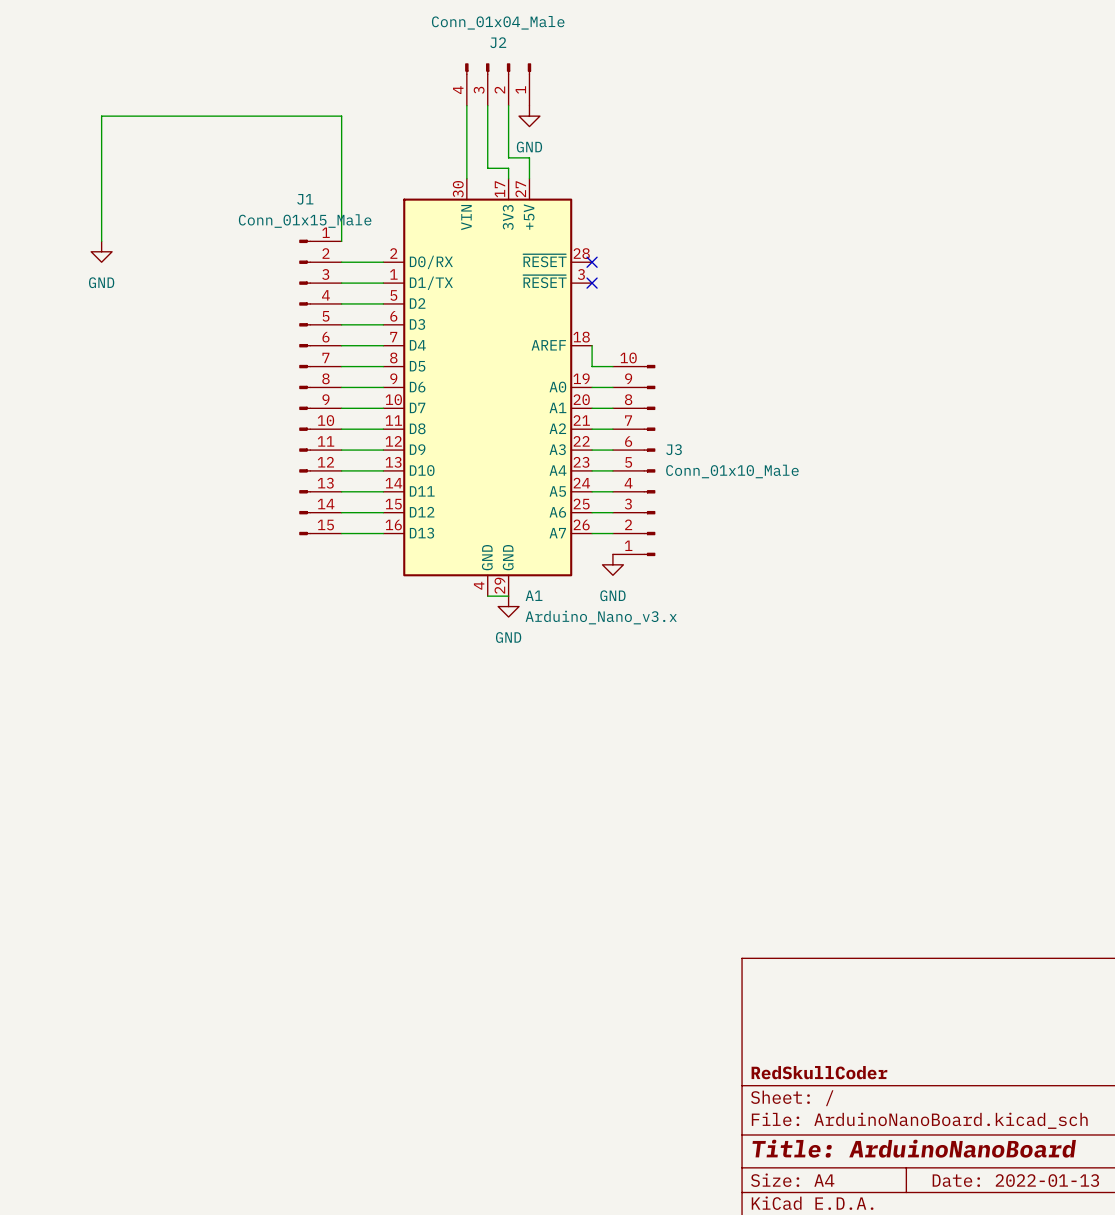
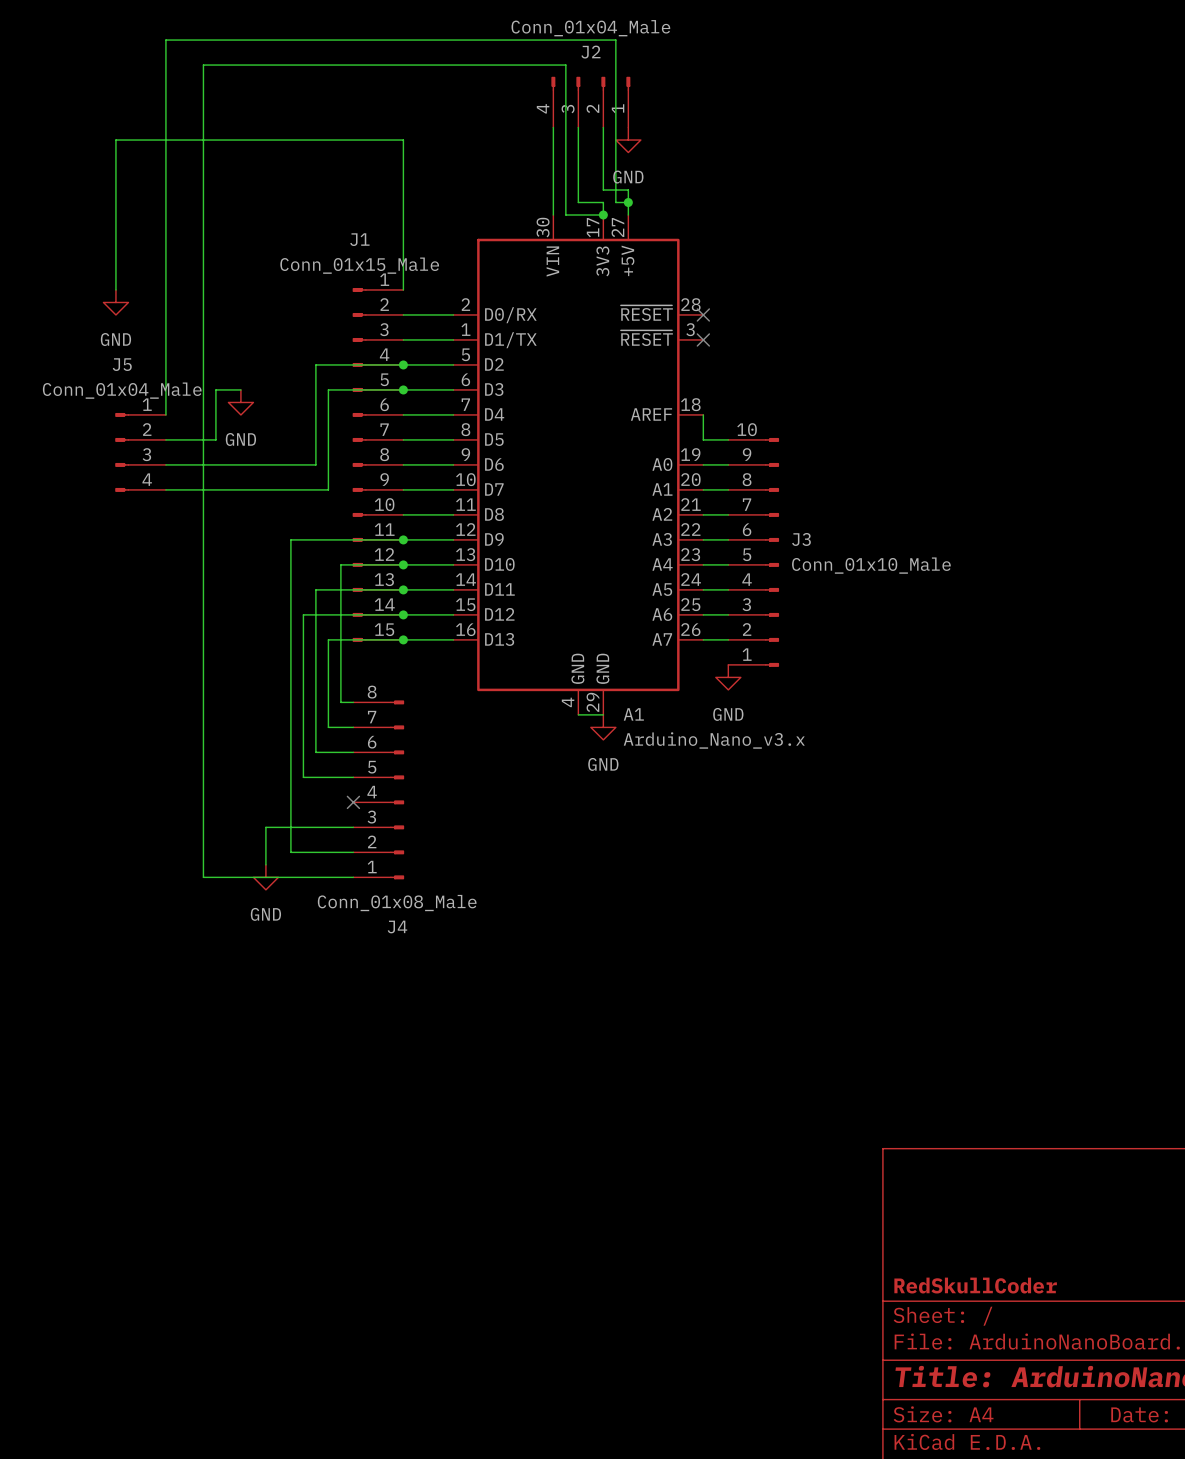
wire: none -> (628, 202) (615, 202) (615, 40) (165, 40) (165, 414)
junction: none -> (628, 202)
wire: none -> (603, 215) (565, 215) (565, 65) (203, 65) (203, 877) (353, 877)
junction: none -> (603, 215)
wire: none -> (403, 364) (315, 364) (315, 464) (165, 464)
junction: none -> (403, 364)
wire: none -> (240, 389) (215, 389) (215, 439) (165, 439)
wire: none -> (403, 389) (328, 389) (328, 489) (165, 489)
junction: none -> (403, 389)
power symbol: none -> GND (240, 402)
J5: none -> Conn_01x04_Male (140, 452)
wire: none -> (403, 539) (290, 539) (290, 852) (353, 852)
junction: none -> (403, 539)
wire: none -> (403, 564) (340, 564) (340, 702) (353, 702)
junction: none -> (403, 564)
wire: none -> (403, 589) (315, 589) (315, 752) (353, 752)
junction: none -> (403, 589)
wire: none -> (403, 614) (303, 614) (303, 777) (353, 777)
junction: none -> (403, 614)
wire: none -> (403, 639) (328, 639) (328, 727) (353, 727)
junction: none -> (403, 639)
J4: none -> Conn_01x08_Male (378, 789)
no-connect mark: none -> (353, 802)
wire: none -> (353, 827) (265, 827) (265, 864)
power symbol: none -> GND (265, 877)

